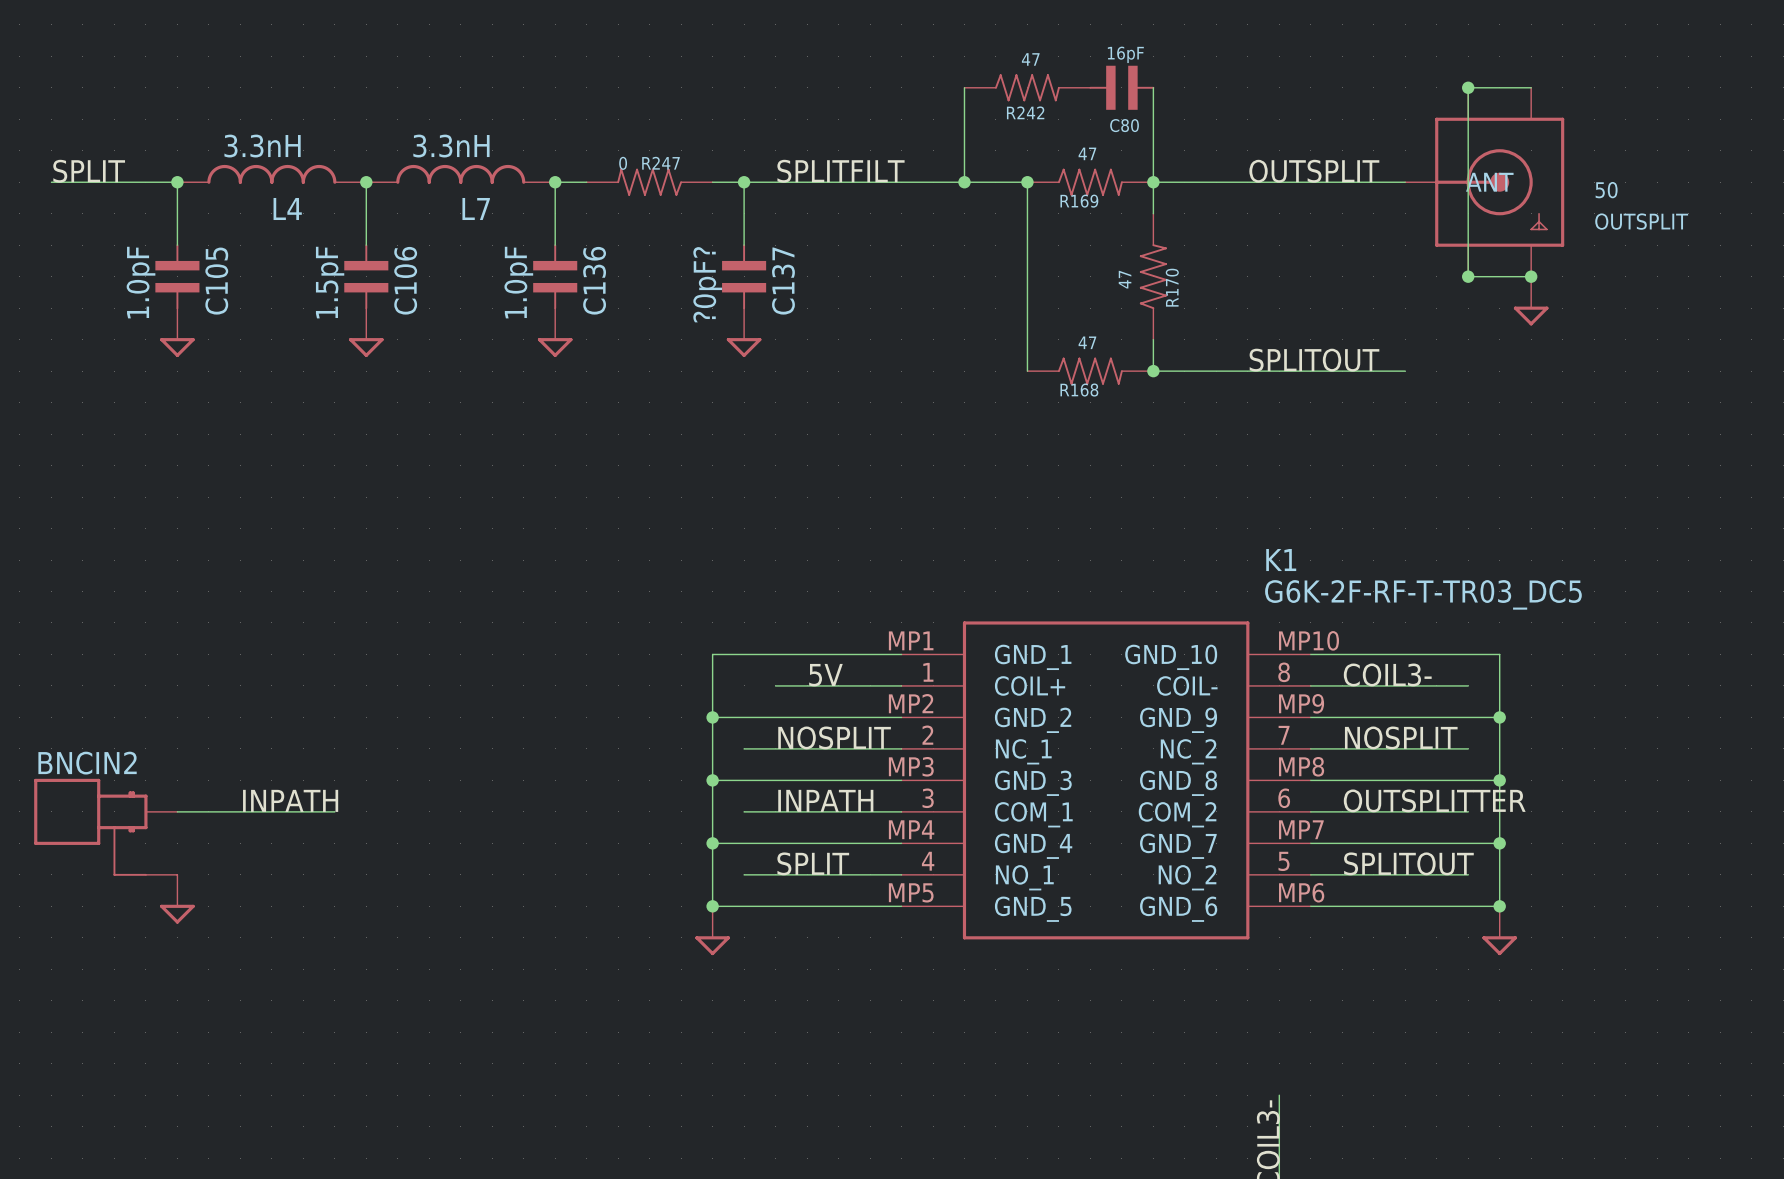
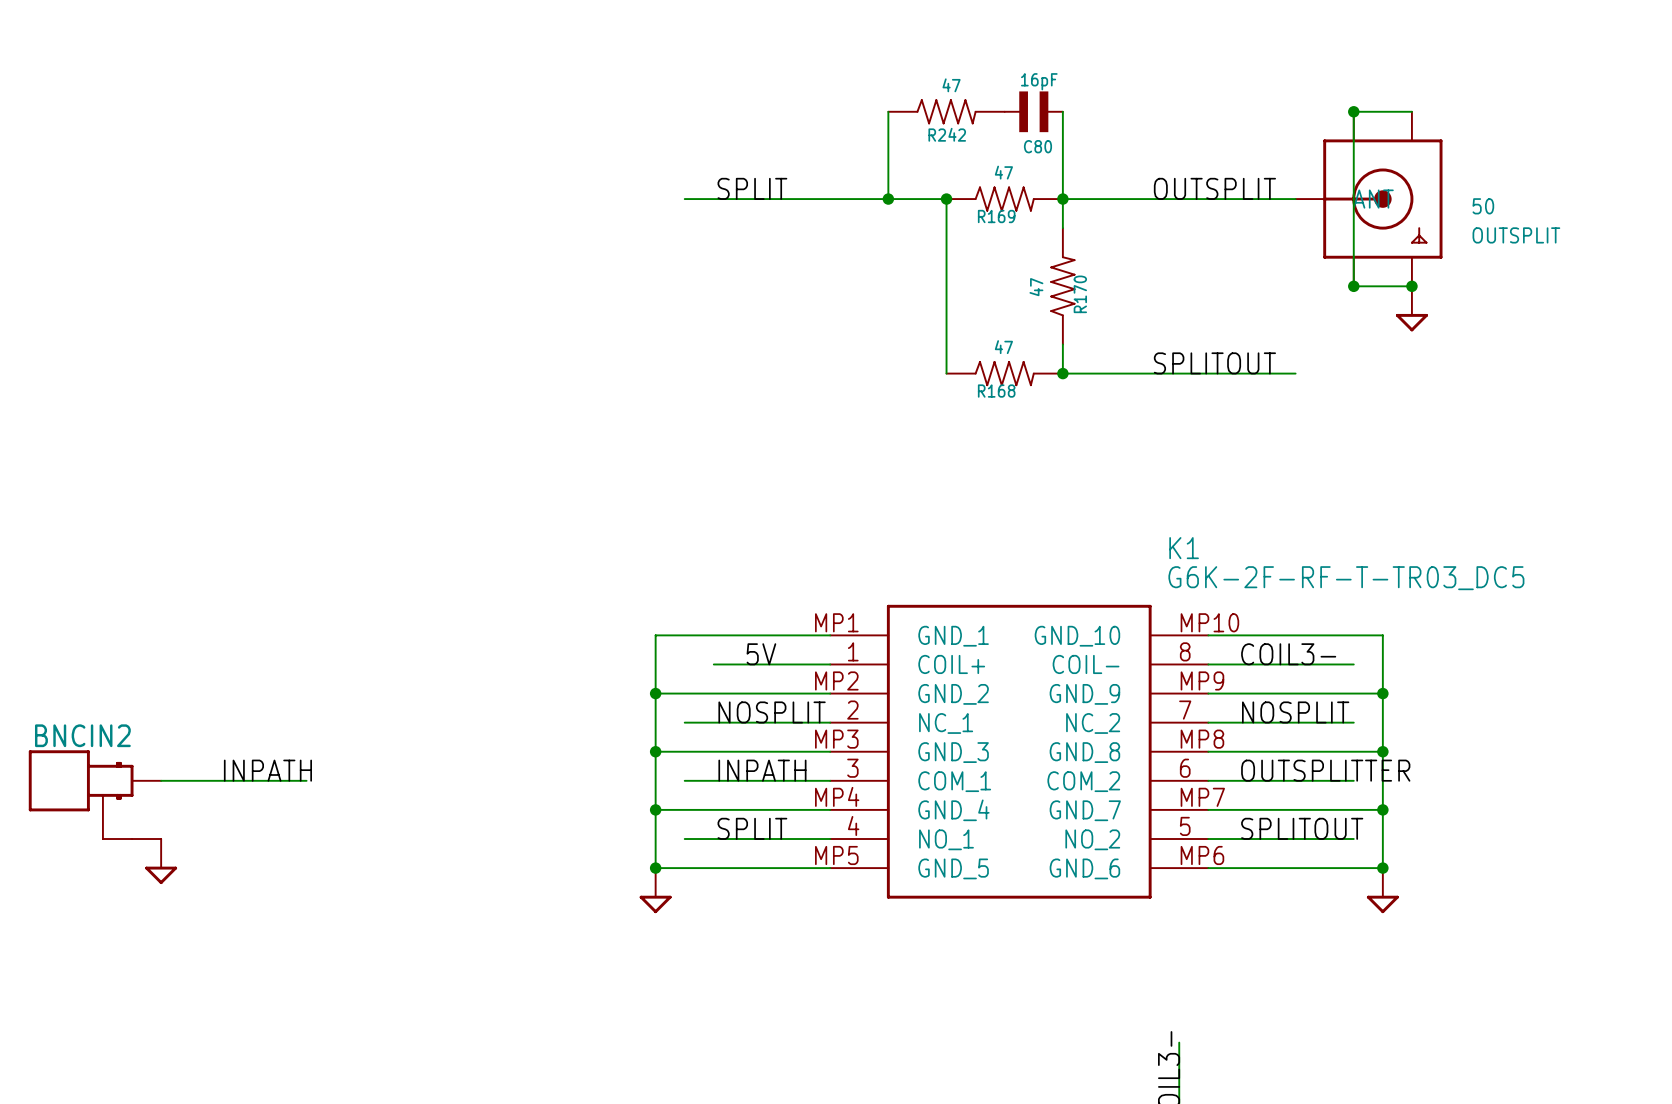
label: SPLIT (89, 171) -> none
label: SPLITFILT (840, 171) -> SPLIT (752, 188)
L4: 3.3nH (271, 174) -> none
L7: 3.3nH (460, 174) -> none
wire: (51, 182) (177, 182) (177, 245) -> none
junction: (177, 182) -> none
wire: (366, 182) (366, 245) -> none
junction: (366, 182) -> none
junction: (555, 182) -> none
wire: (586, 182) (555, 182) (555, 245) -> none
R247: 0 (649, 182) -> none
wire: (712, 182) (744, 182) (744, 245) -> none
junction: (744, 182) -> none
C105: 1.0pF (177, 276) -> none
C106: 1.5pF (366, 276) -> none
C136: 1.0pF (555, 276) -> none
C137: ?0pF? (744, 276) -> none
power symbol: (177, 332) -> none
power symbol: (366, 332) -> none
power symbol: (555, 332) -> none
power symbol: (744, 332) -> none

